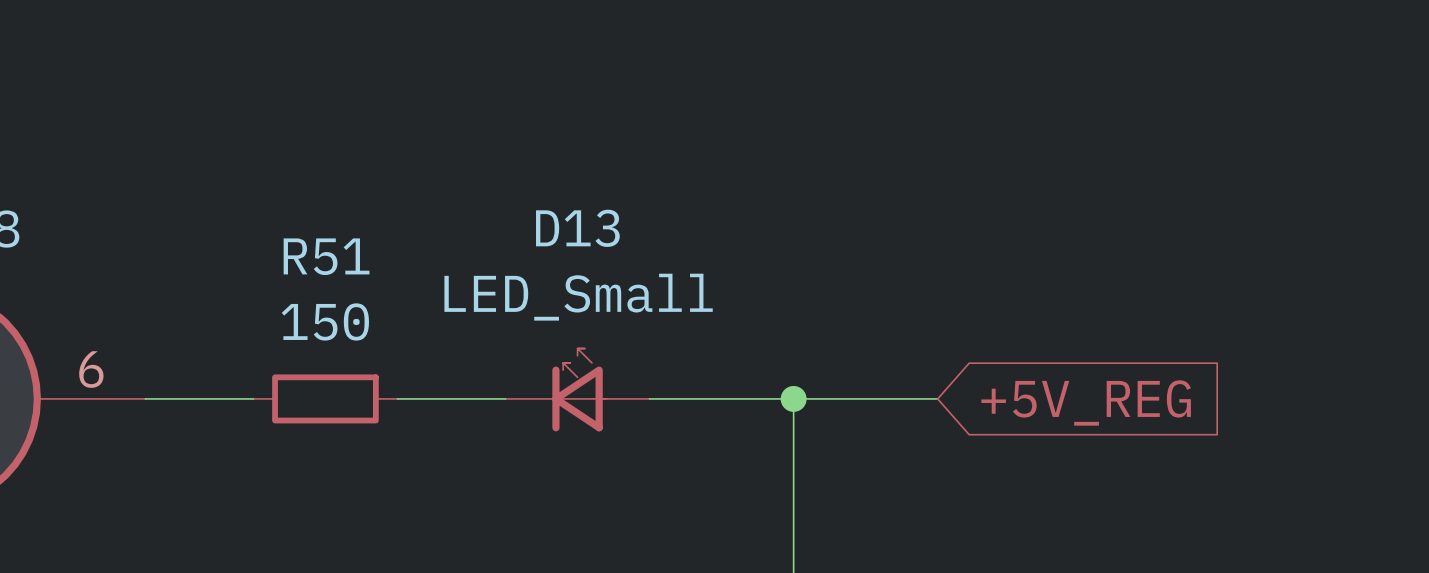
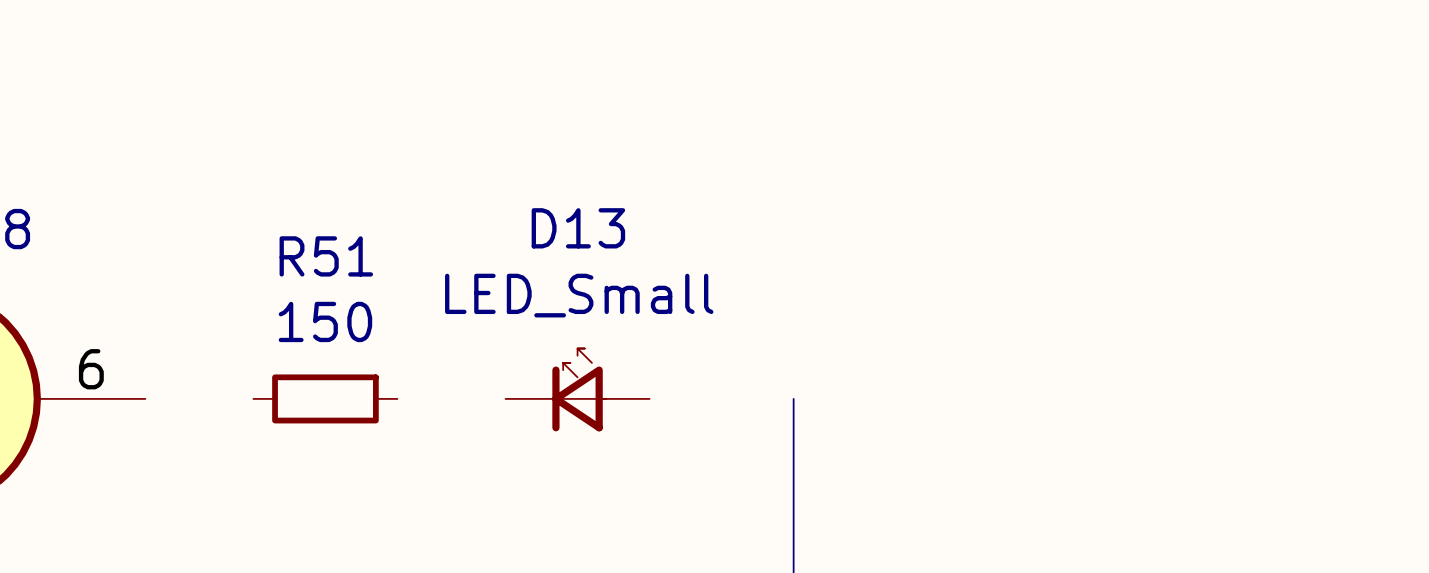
wire: (145, 398) (253, 398) -> none
wire: (397, 398) (505, 398) -> none
wire: (649, 398) (937, 398) -> none
junction: (793, 398) -> none
global label: +5V_REG (1086, 402) -> none

